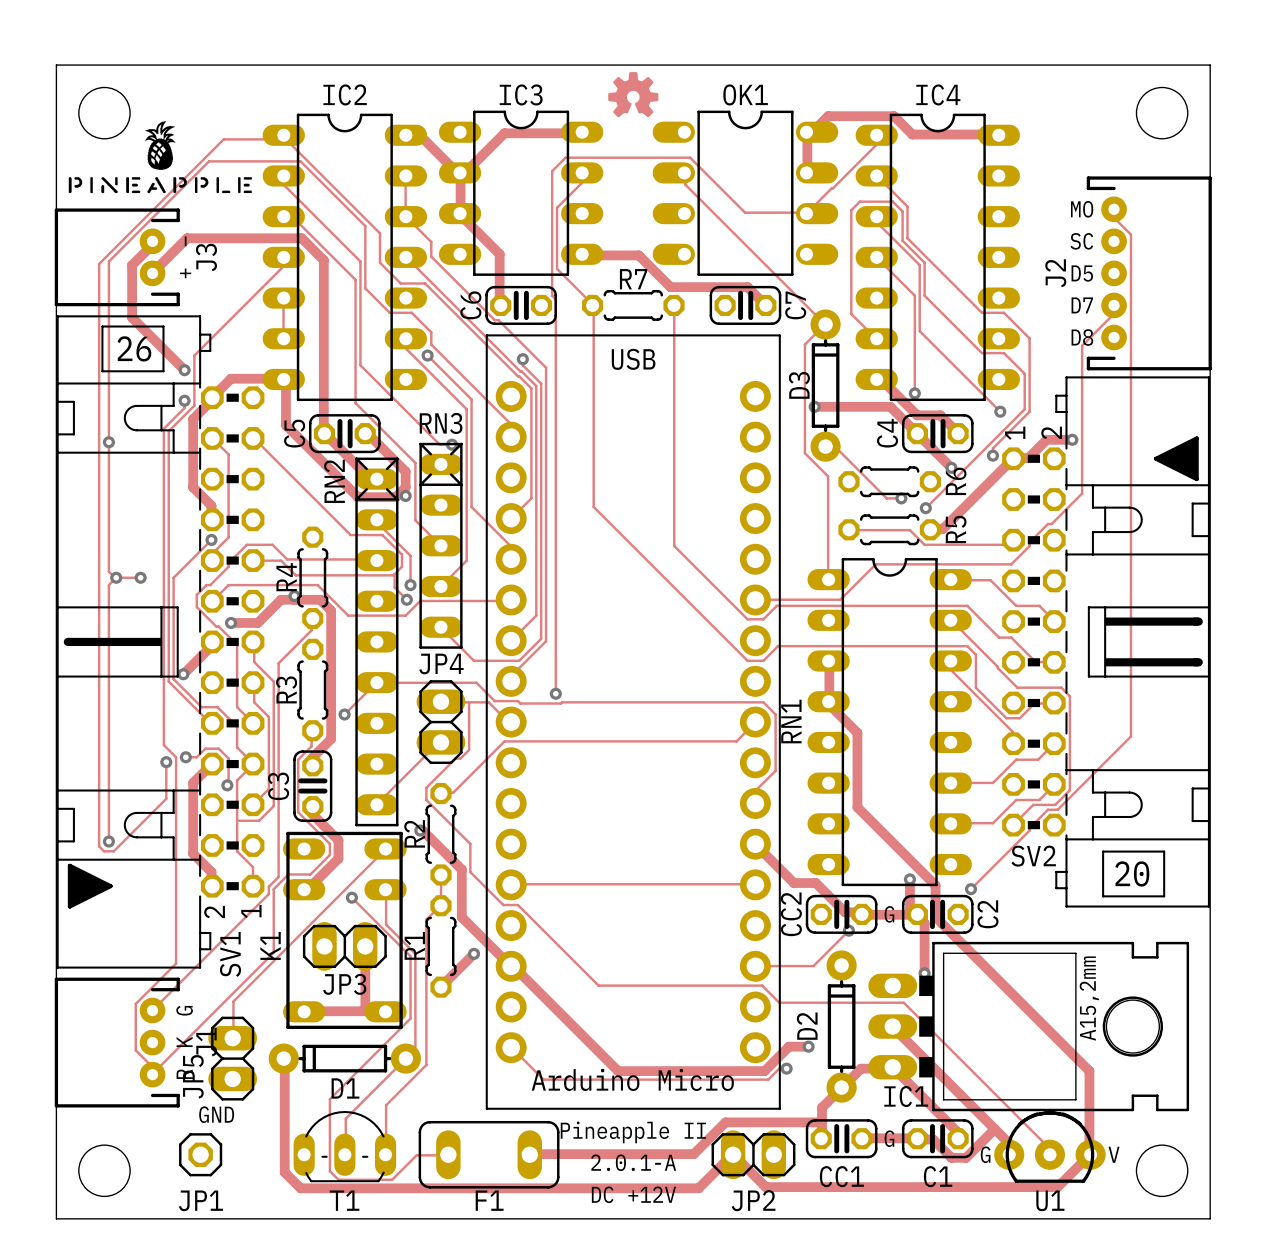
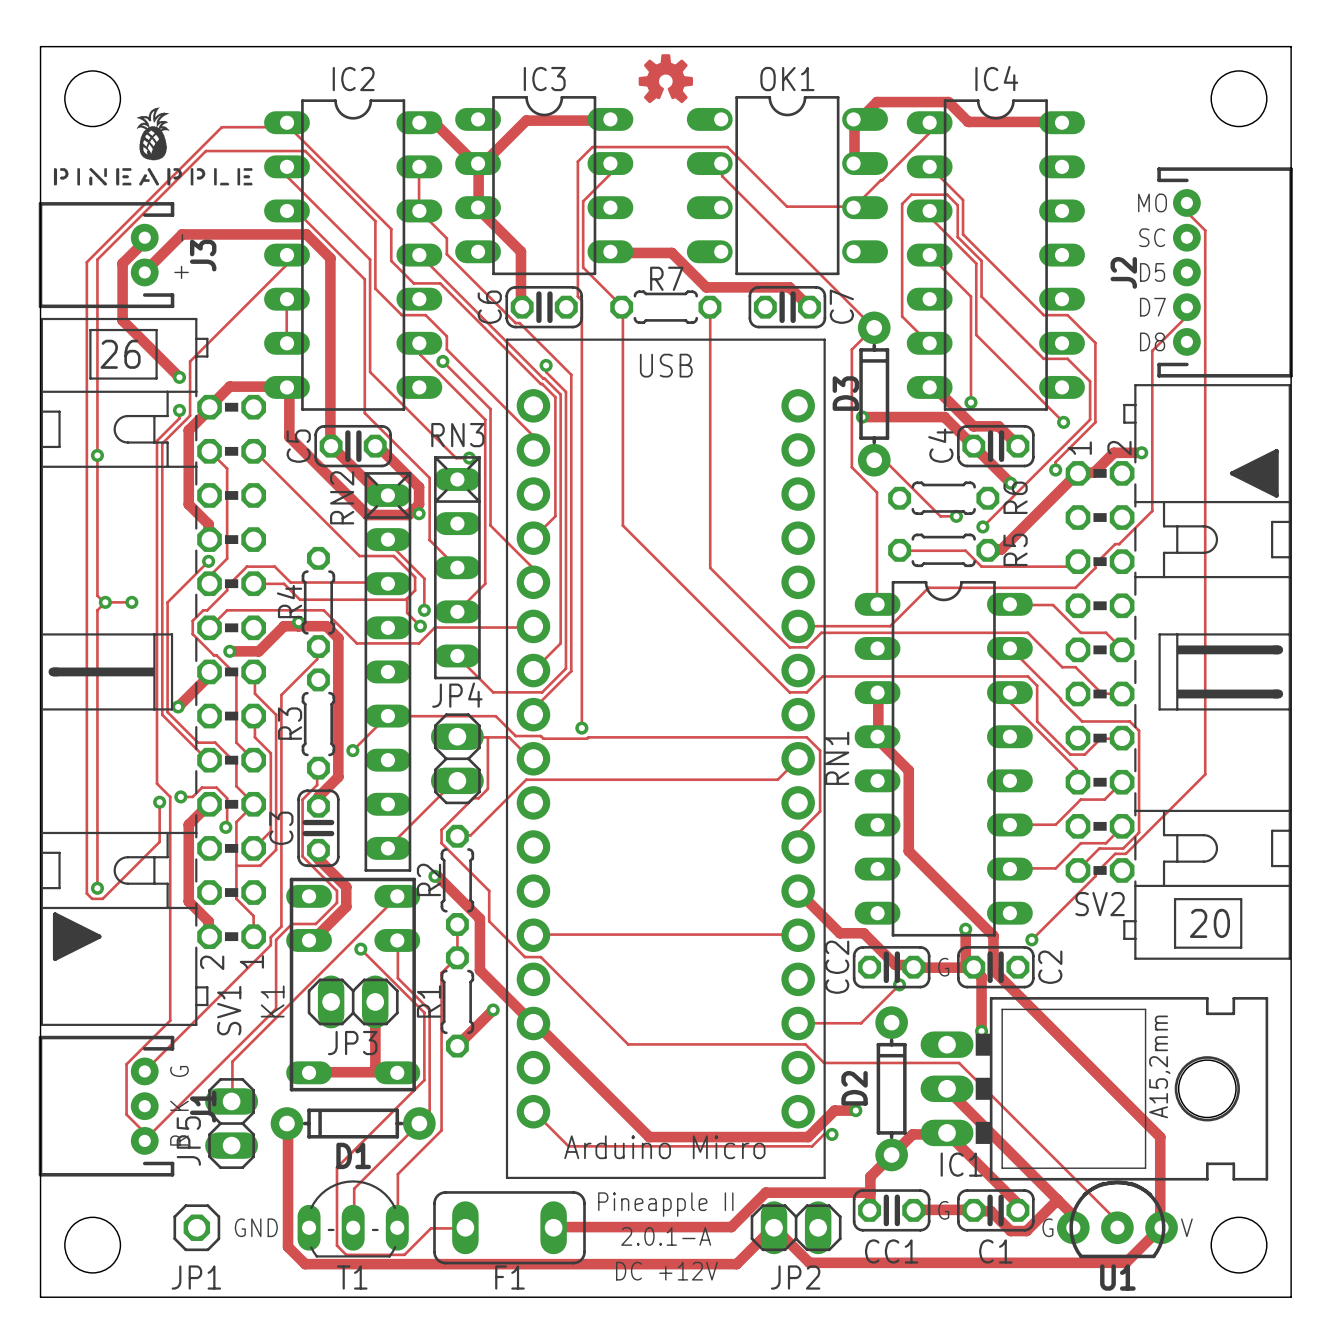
text position: GND (216, 1114) -> GND (256, 1227)

